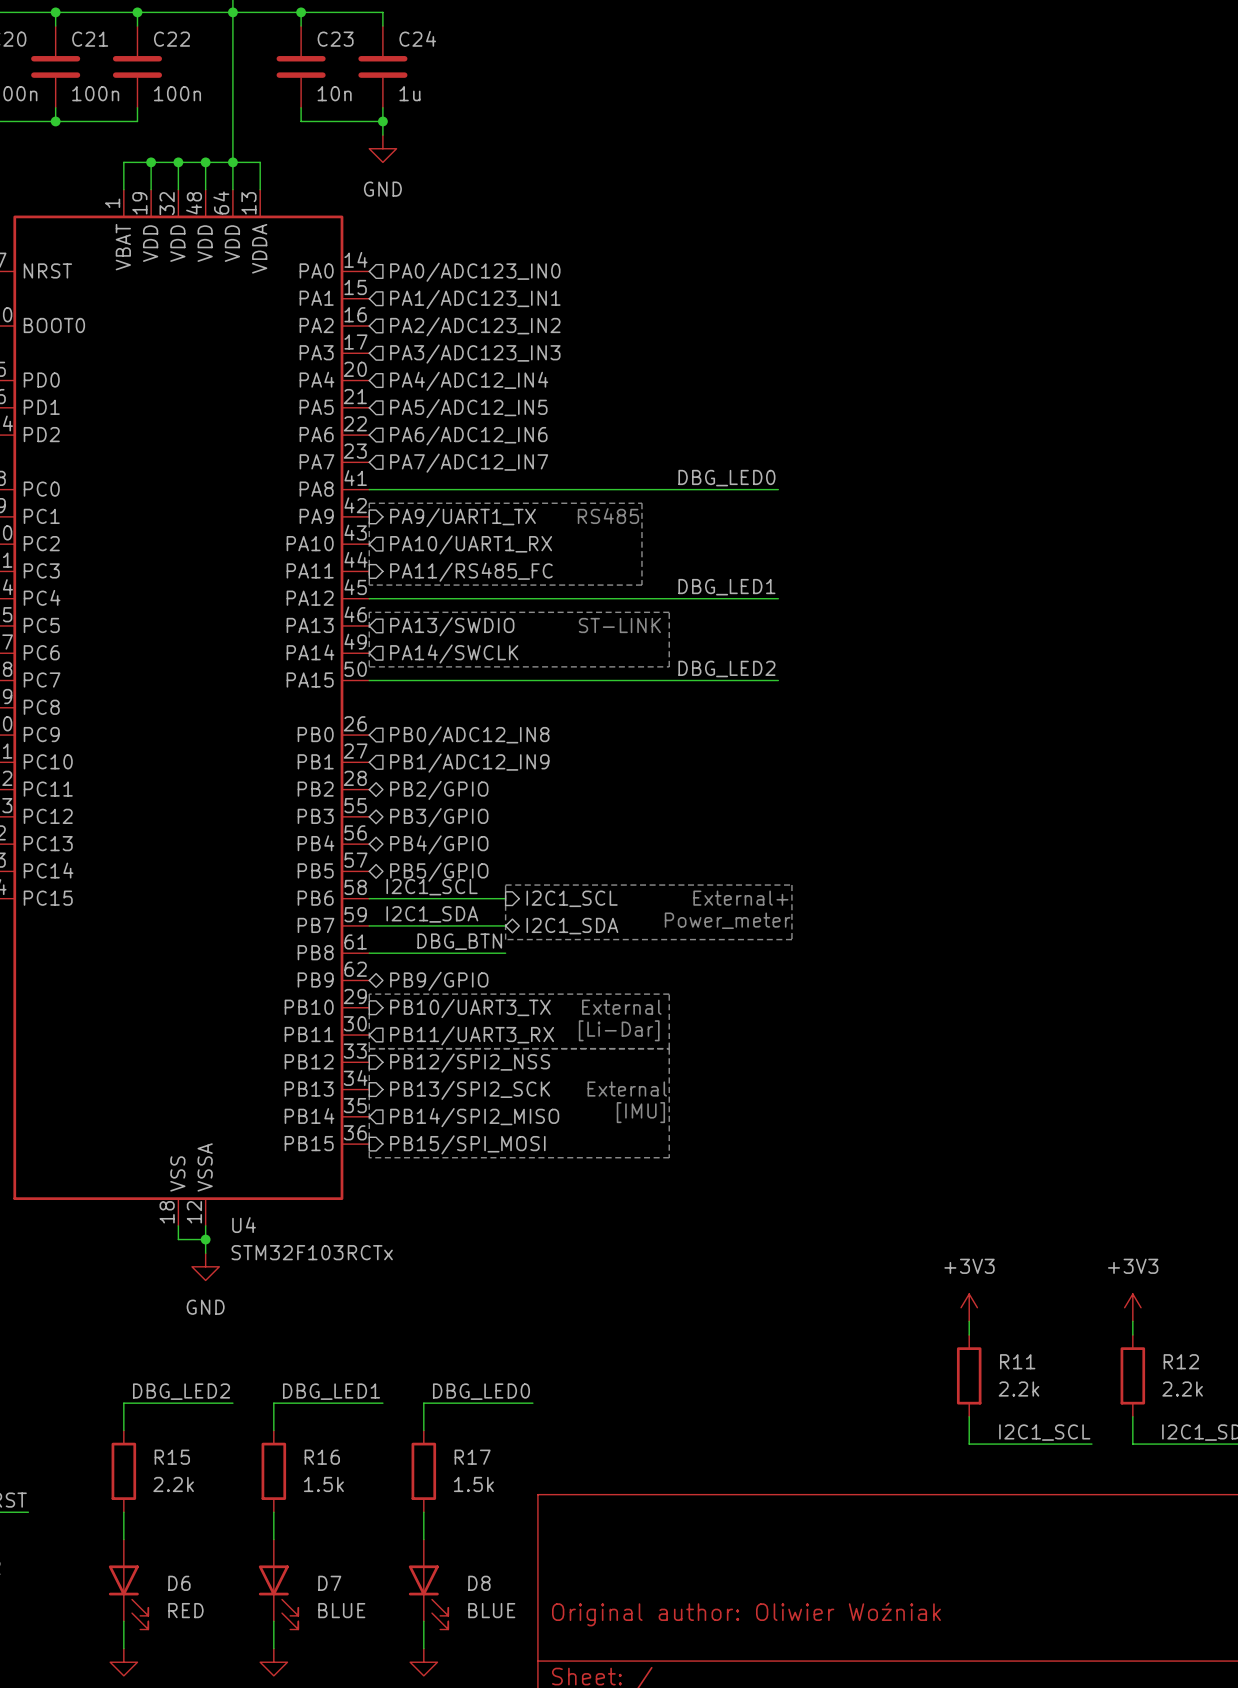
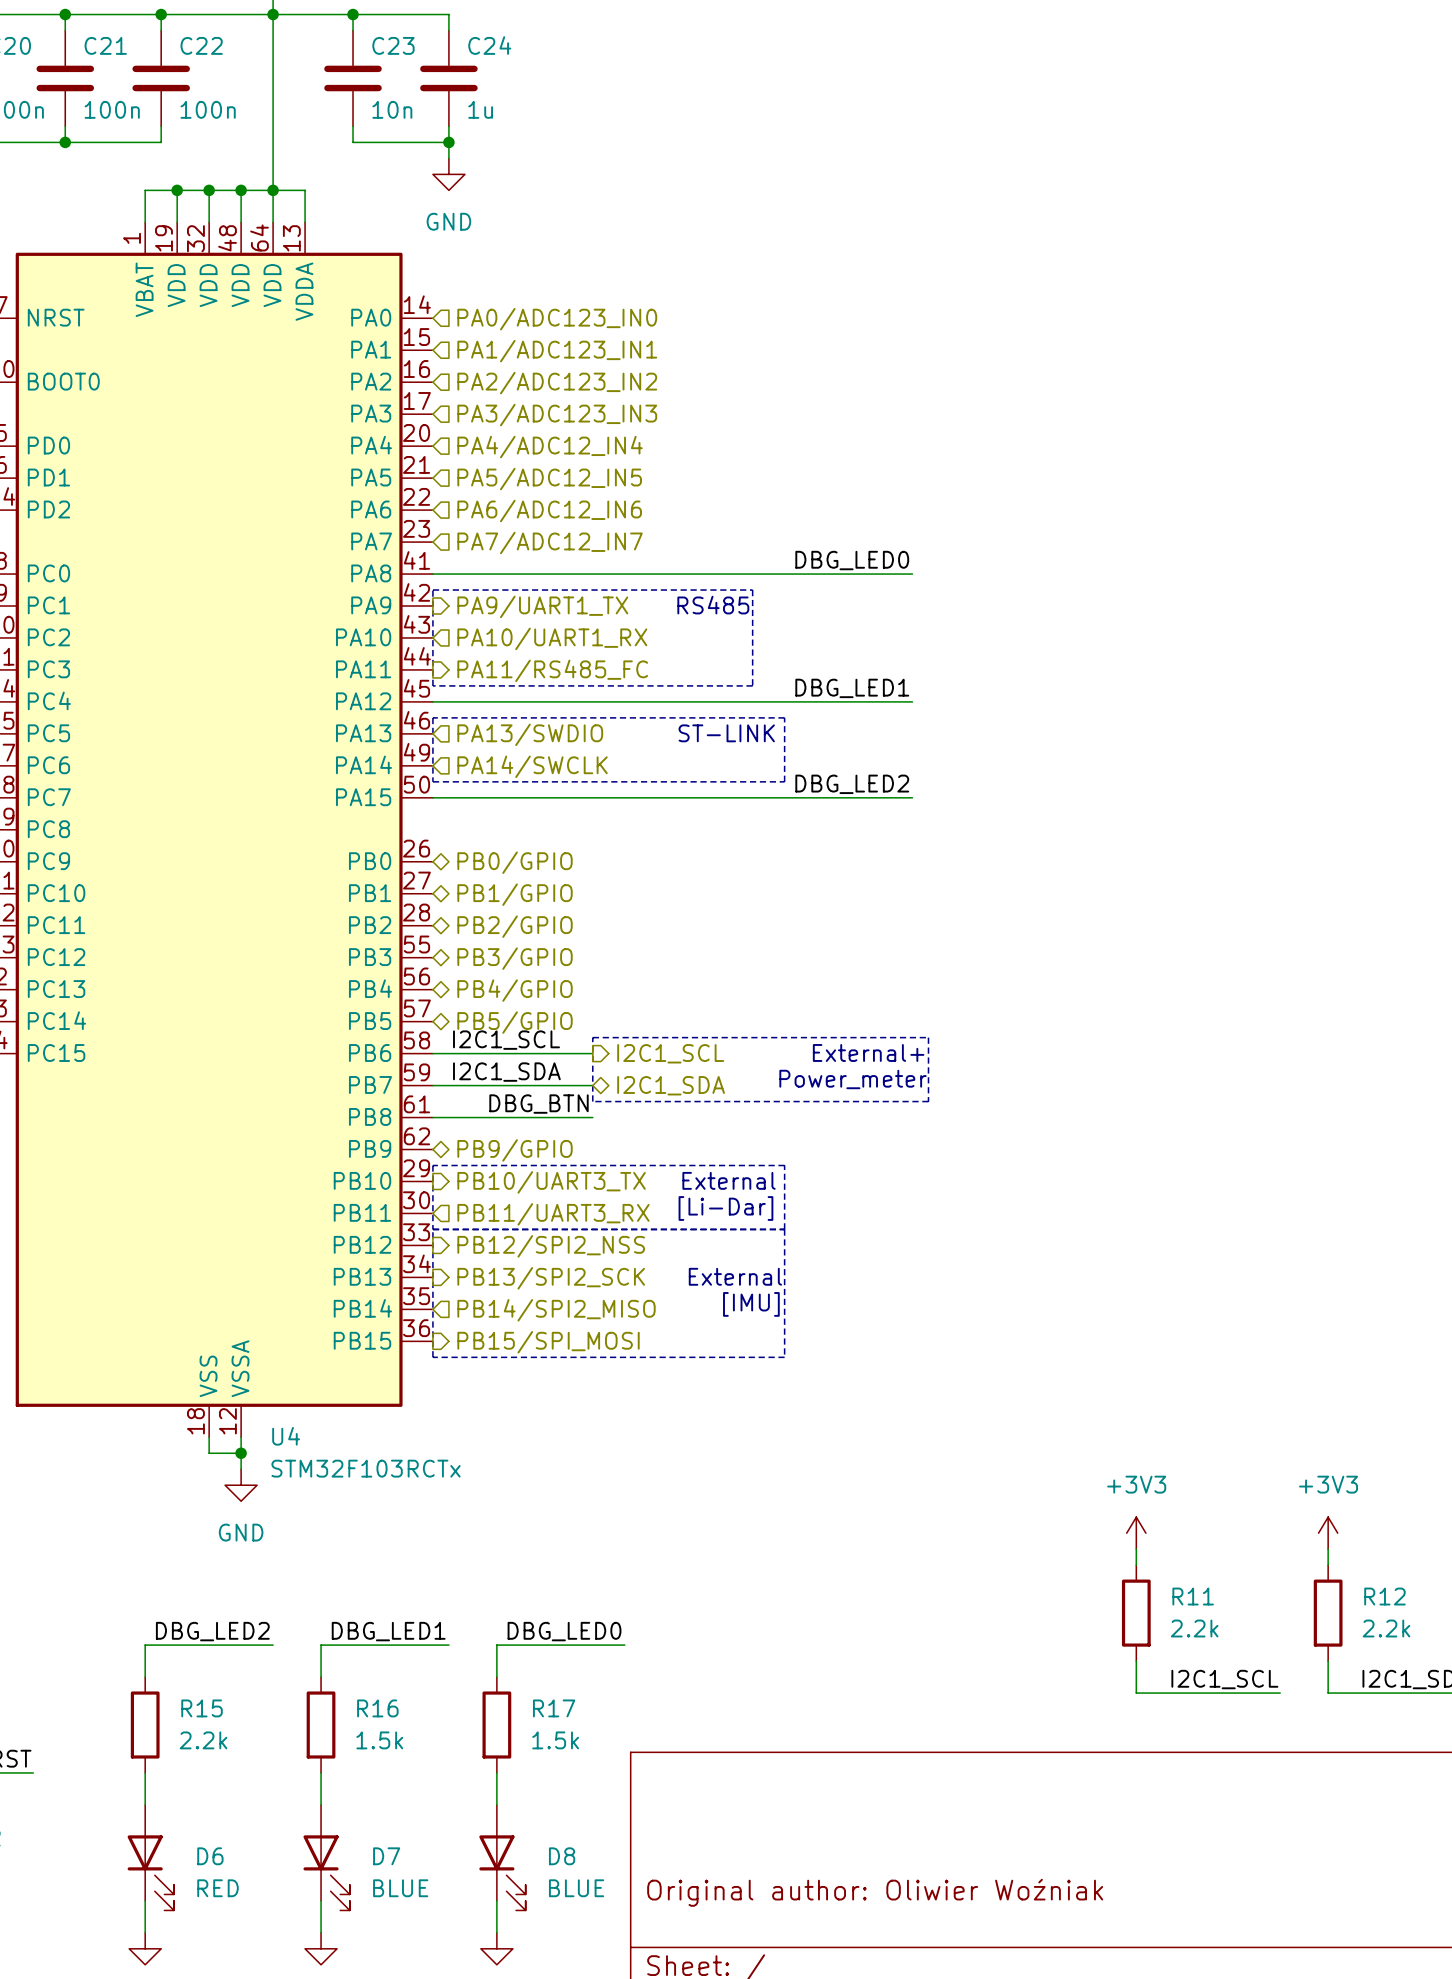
hierarchical label shape: input (469, 735) -> bidirectional (515, 862)
hierarchical label: PB0/ADC12_IN8 (469, 735) -> PB0/GPIO (515, 862)
hierarchical label shape: input (469, 763) -> bidirectional (515, 894)
hierarchical label: PB1/ADC12_IN9 (469, 763) -> PB1/GPIO (515, 894)

